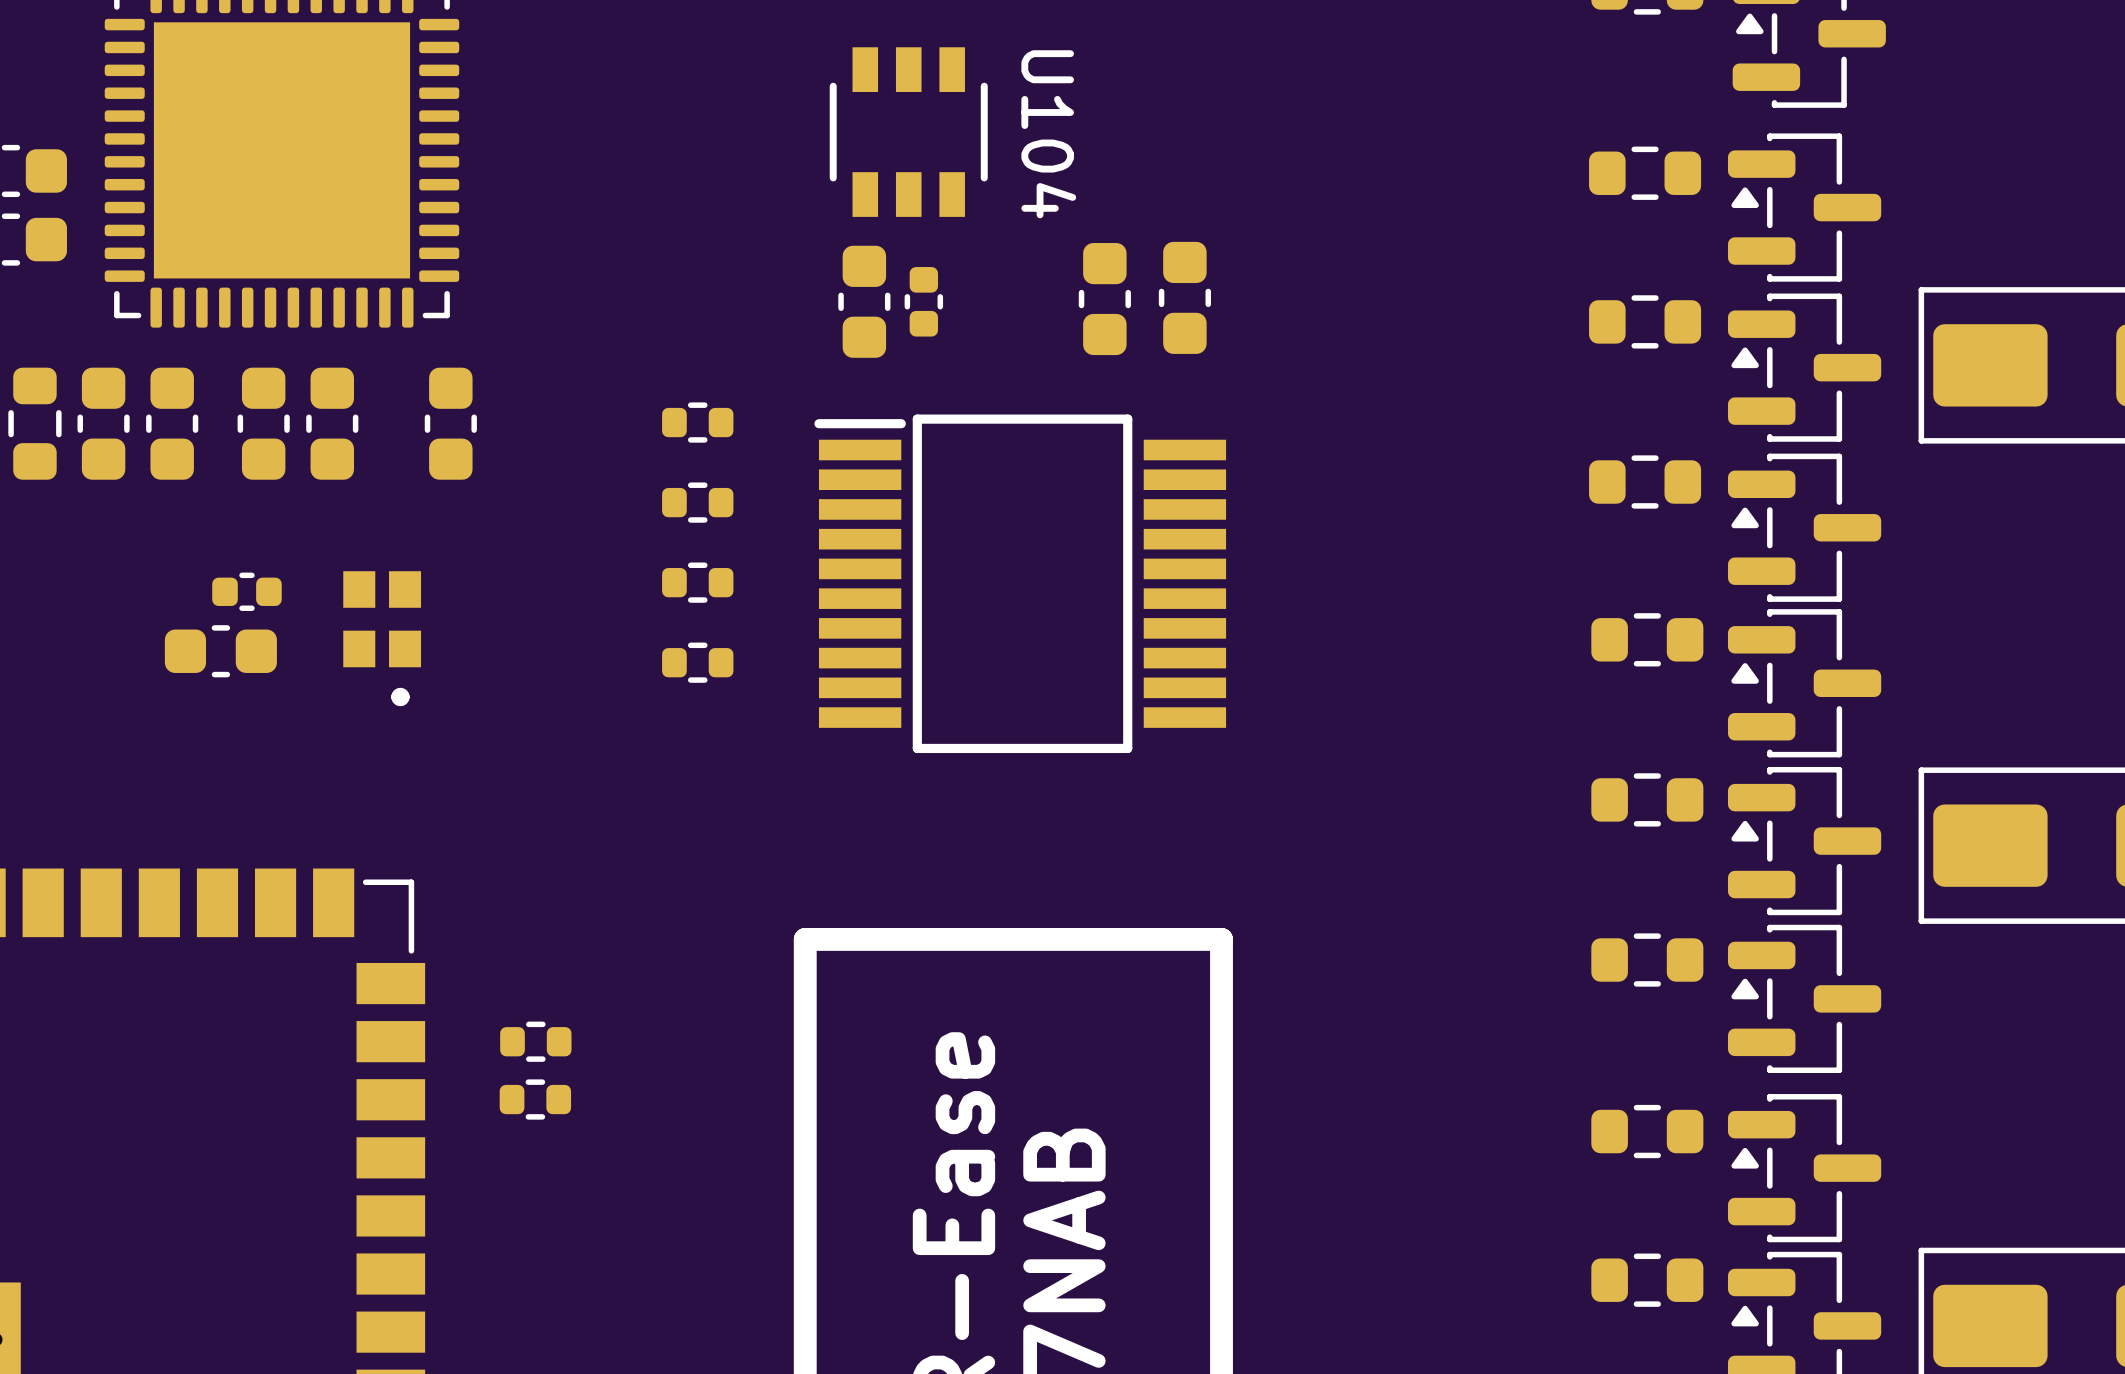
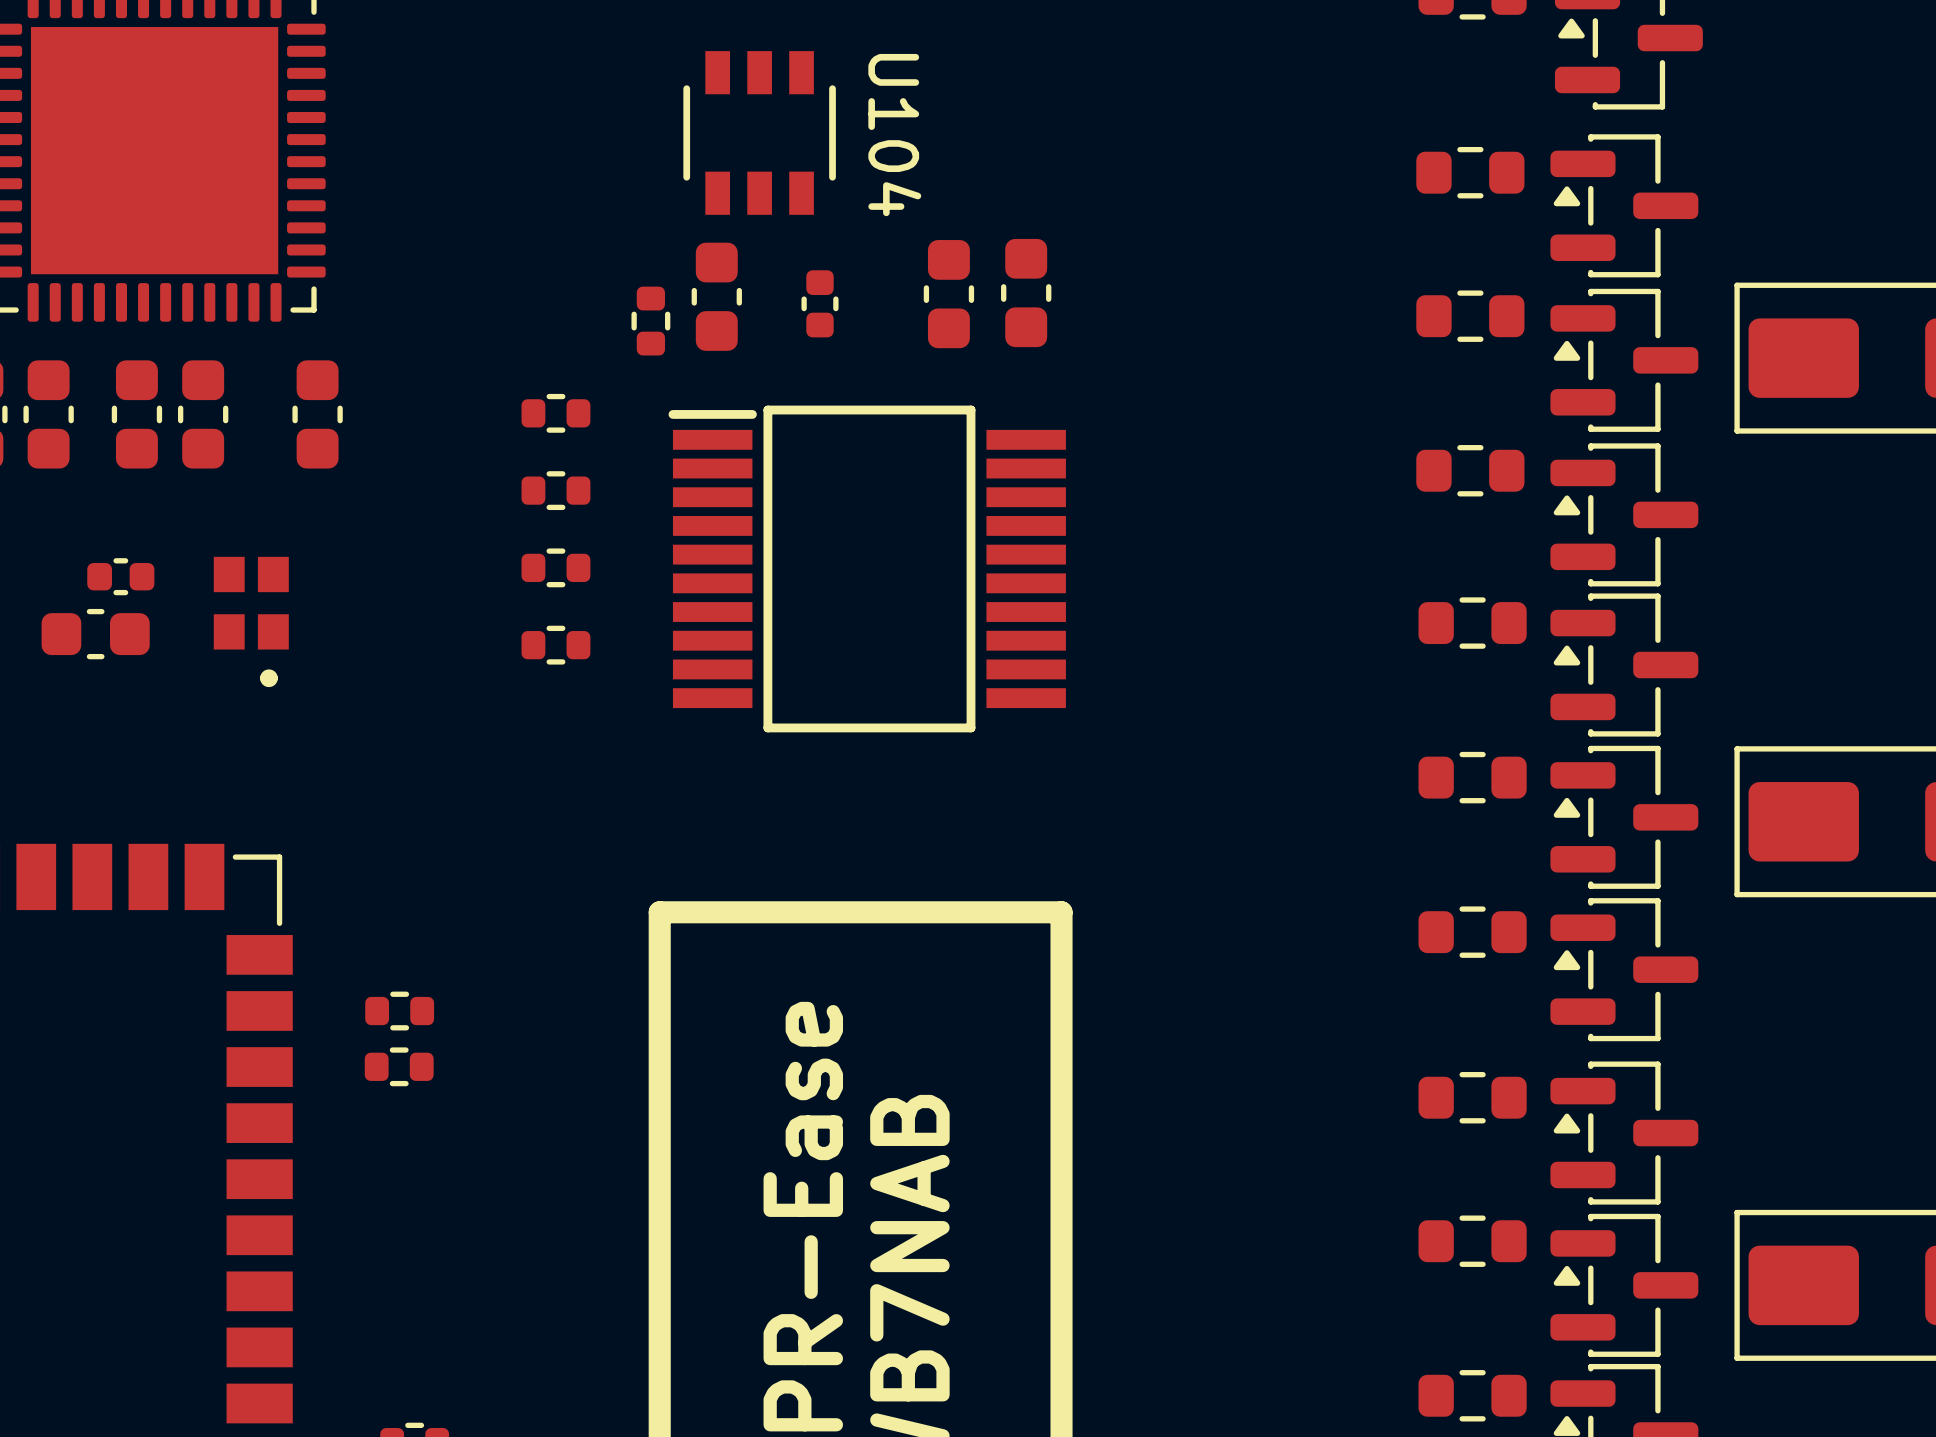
part position: (923, 301) -> (820, 303)
part: none -> (650, 321)

